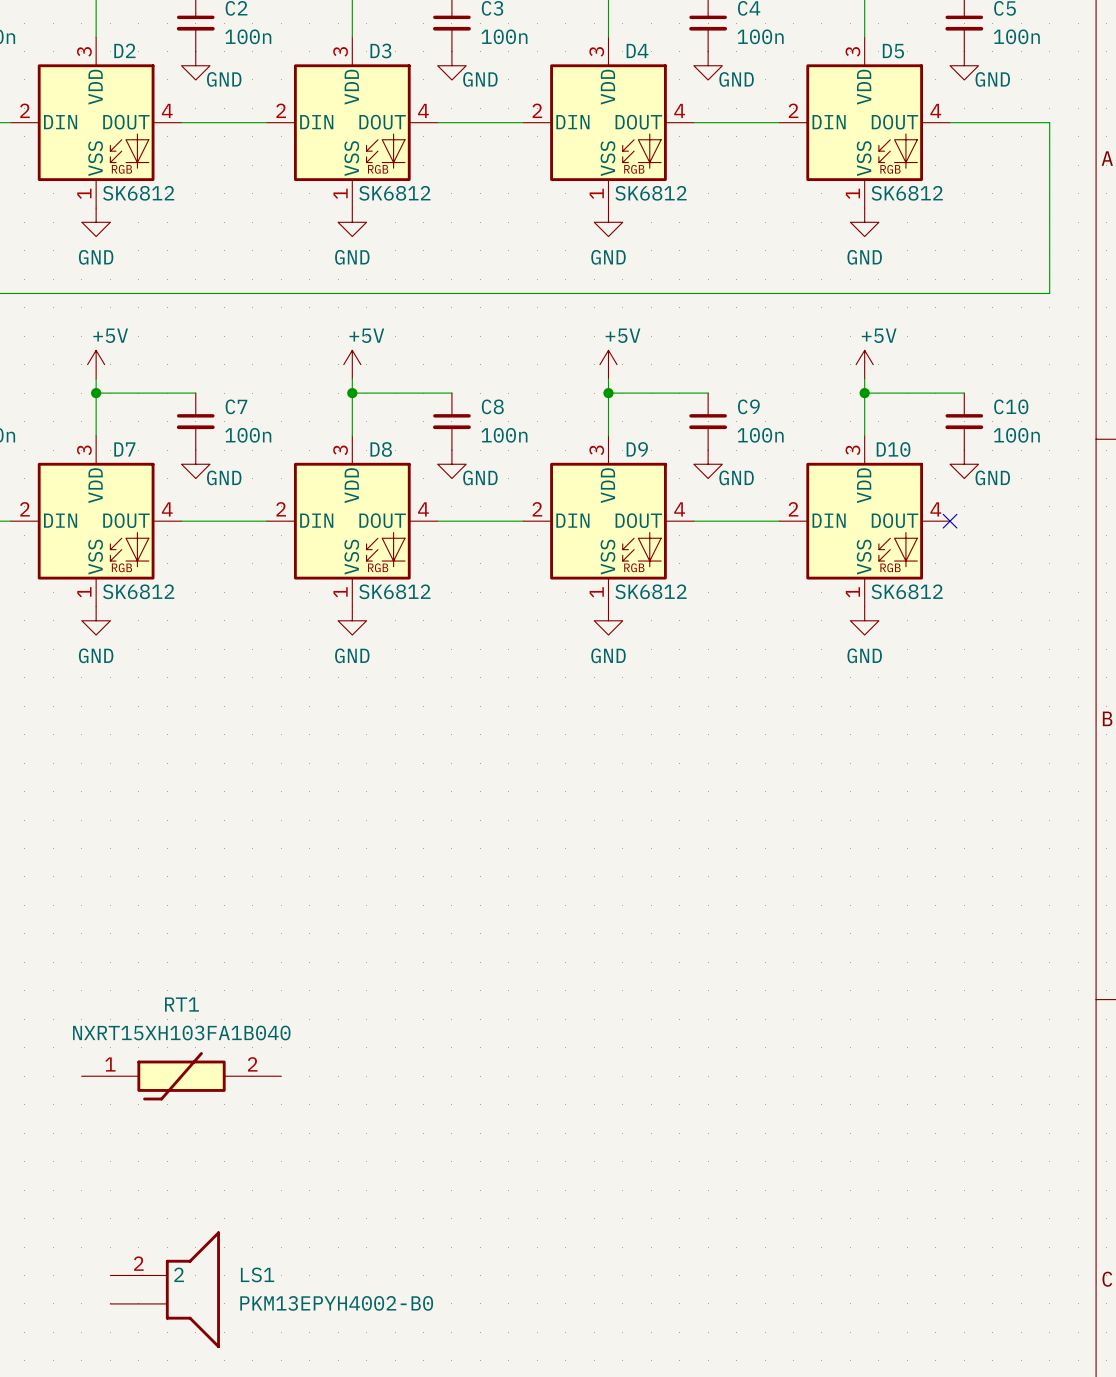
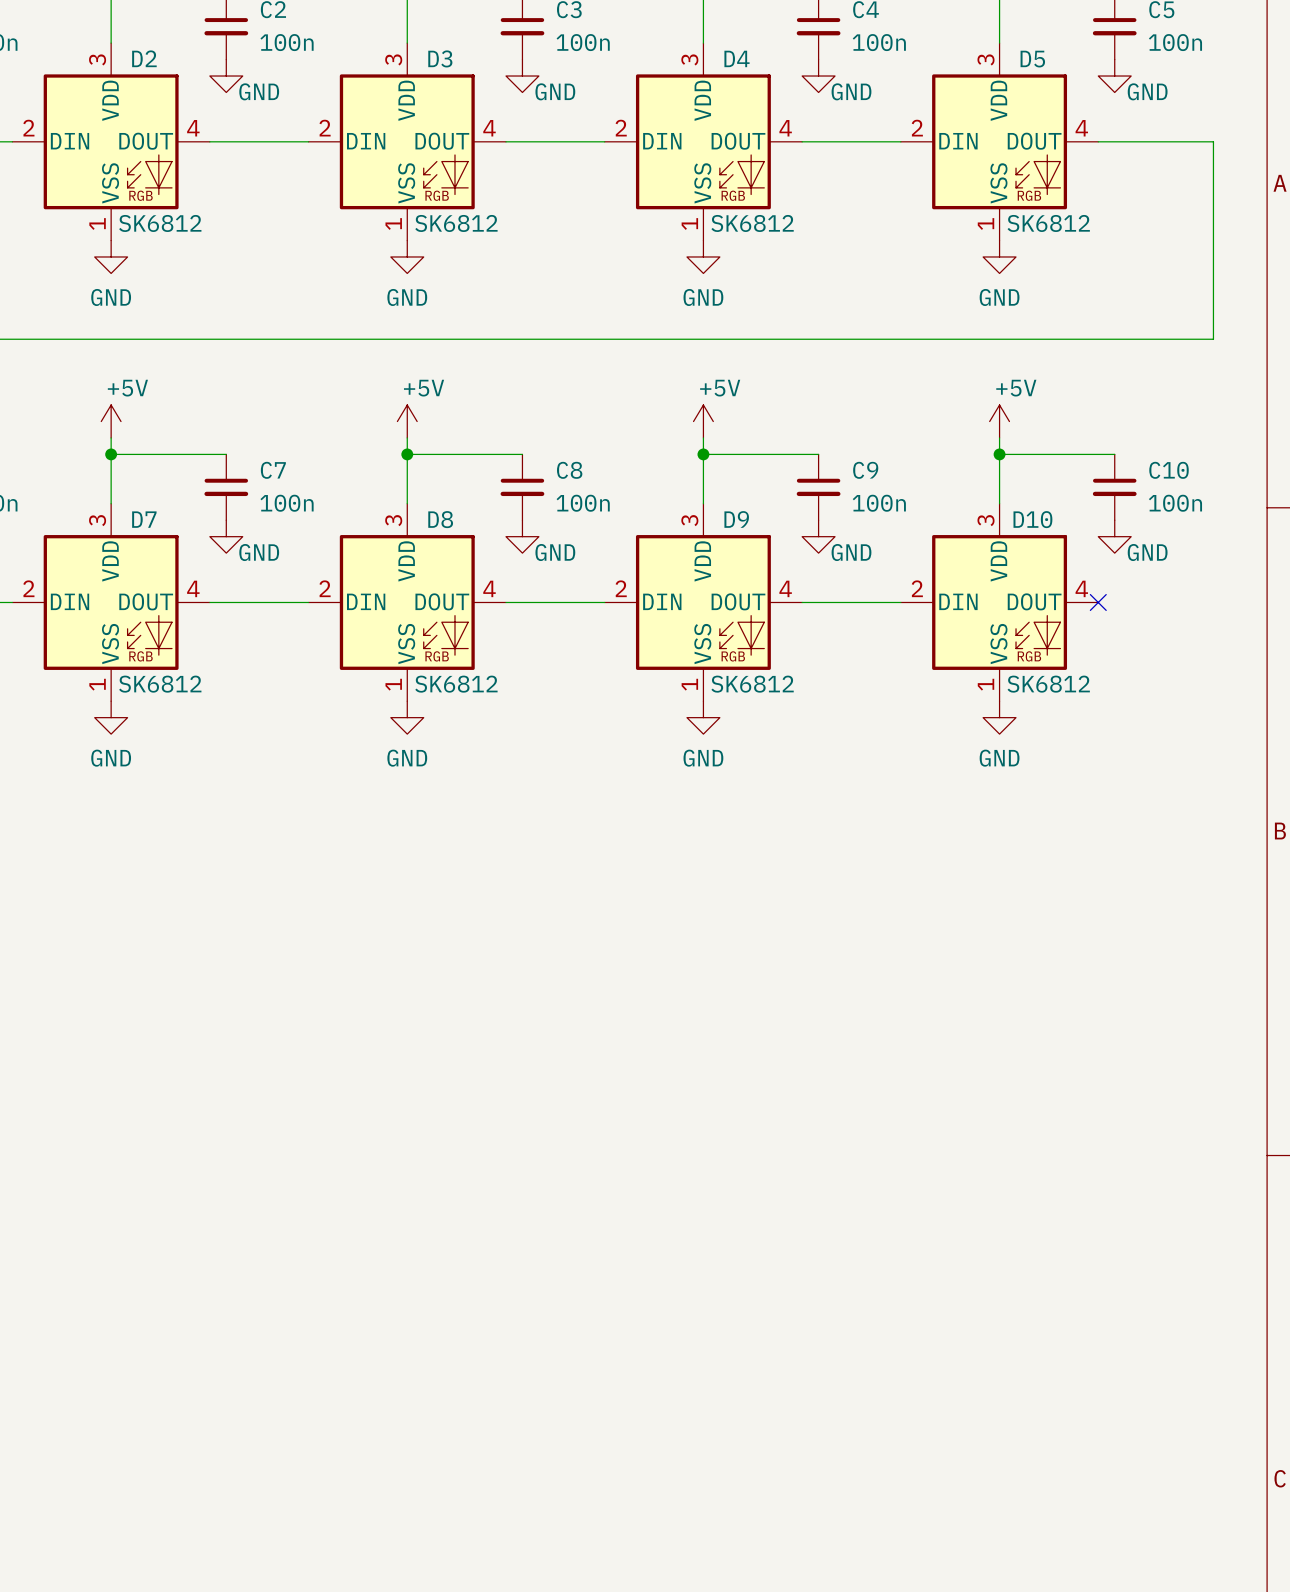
RT1: NXRT15XH103FA1B040 (181, 1076) -> none
LS1: PKM13EPYH4002-B0 (165, 1289) -> none

